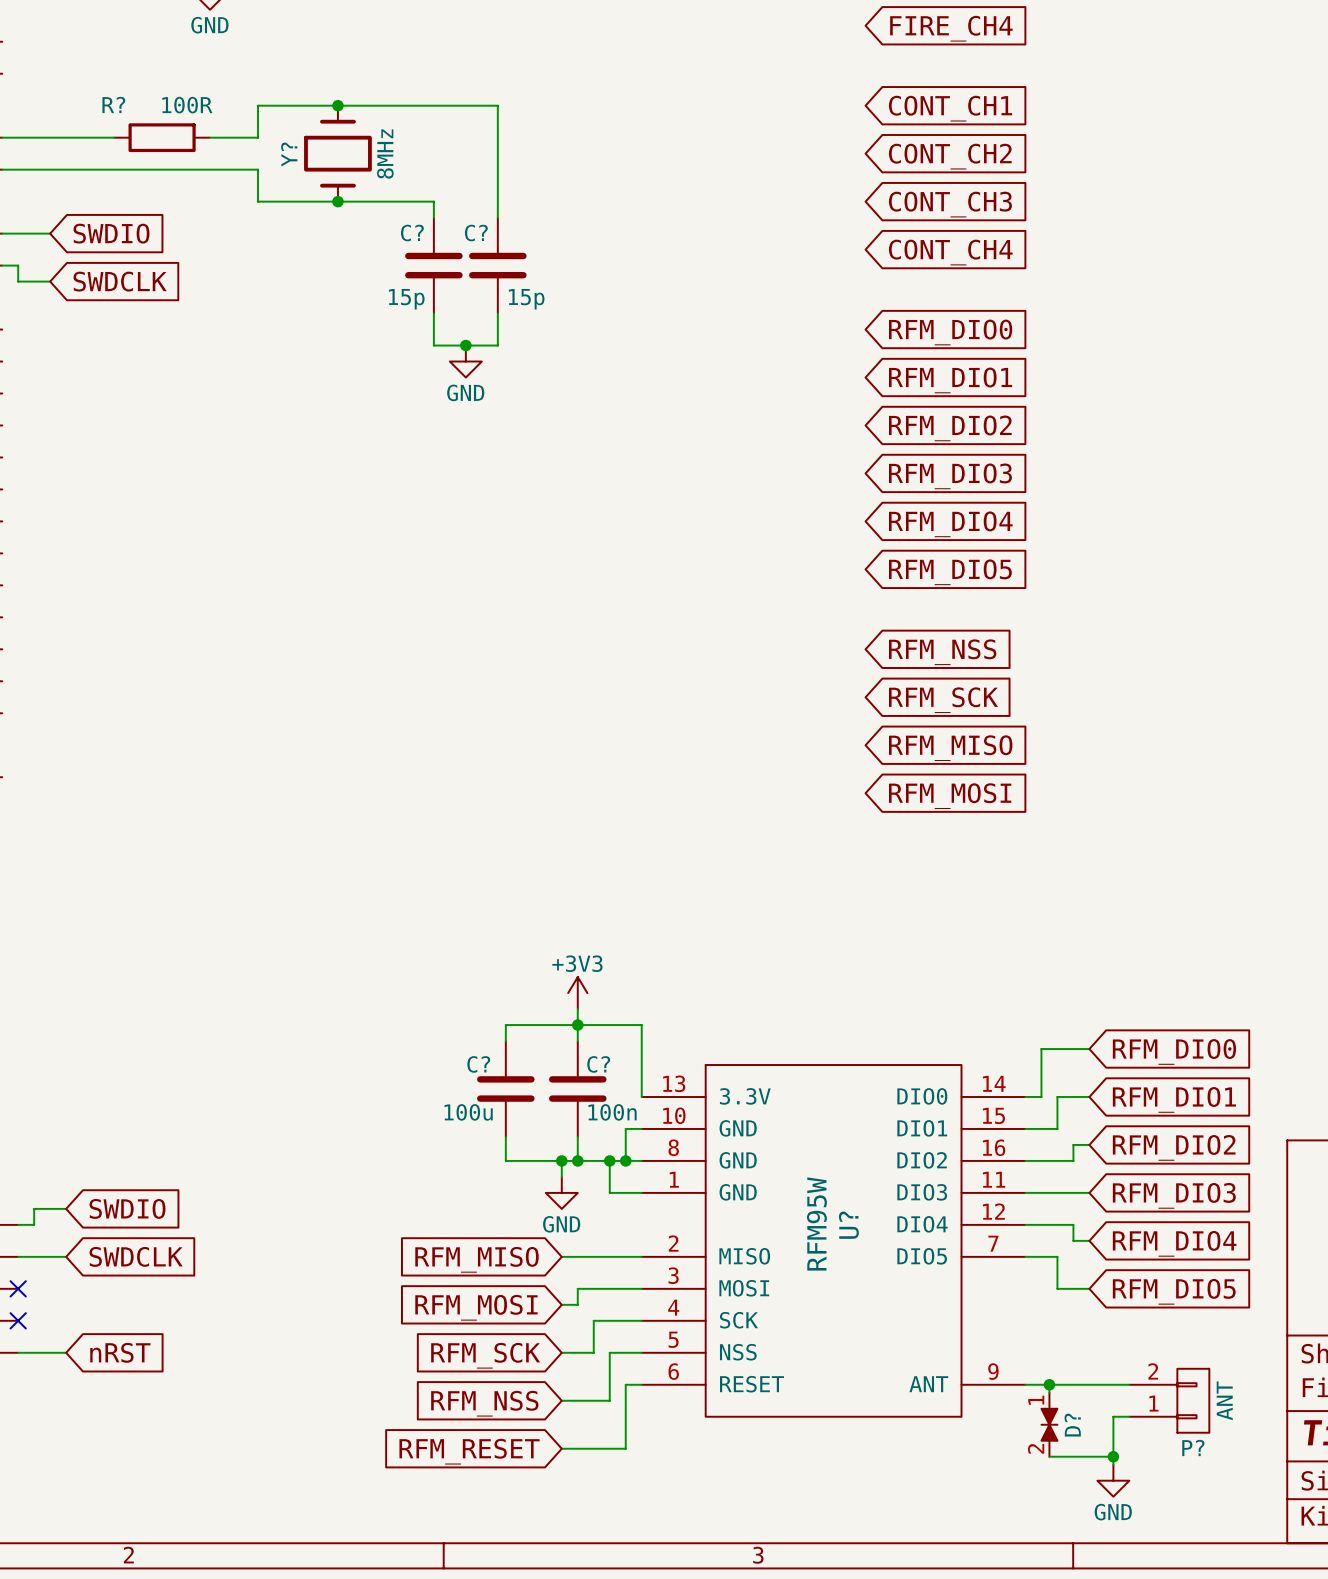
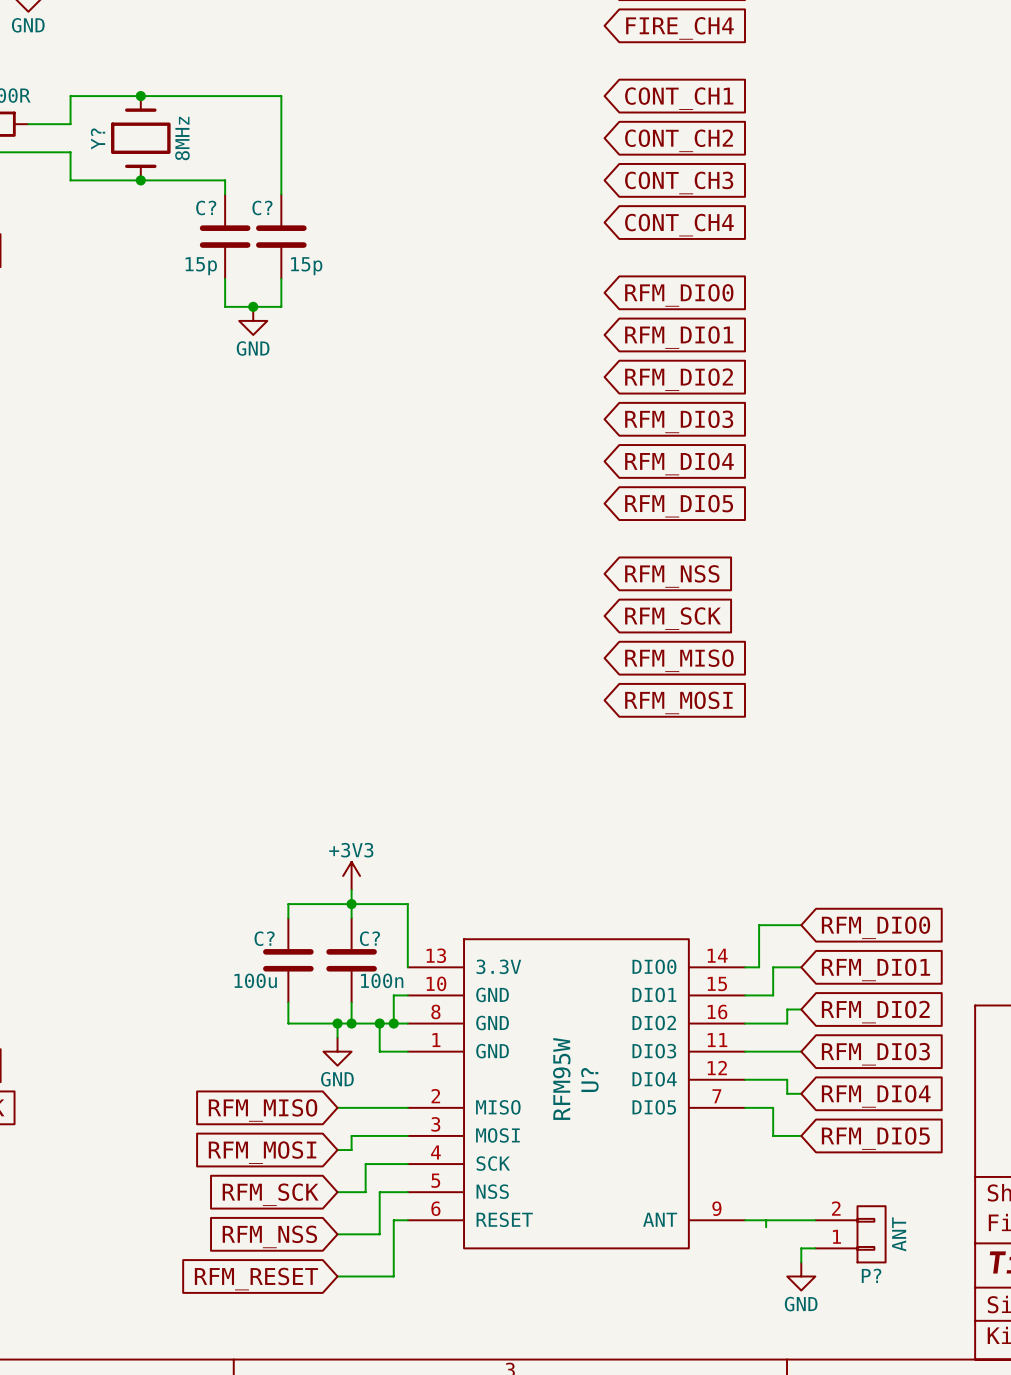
junction: (1049, 1384) -> none
P? position: (1169, 1400) -> (850, 1234)
wire: none -> (815, 1248) (801, 1248) (801, 1262)
wire: (1129, 1416) (1113, 1416) (1113, 1464) -> none
D?: (1049, 1424) -> none
wire: (1049, 1456) (1113, 1456) -> none
junction: (1113, 1456) -> none
power symbol position: GND (1113, 1480) -> GND (801, 1276)

